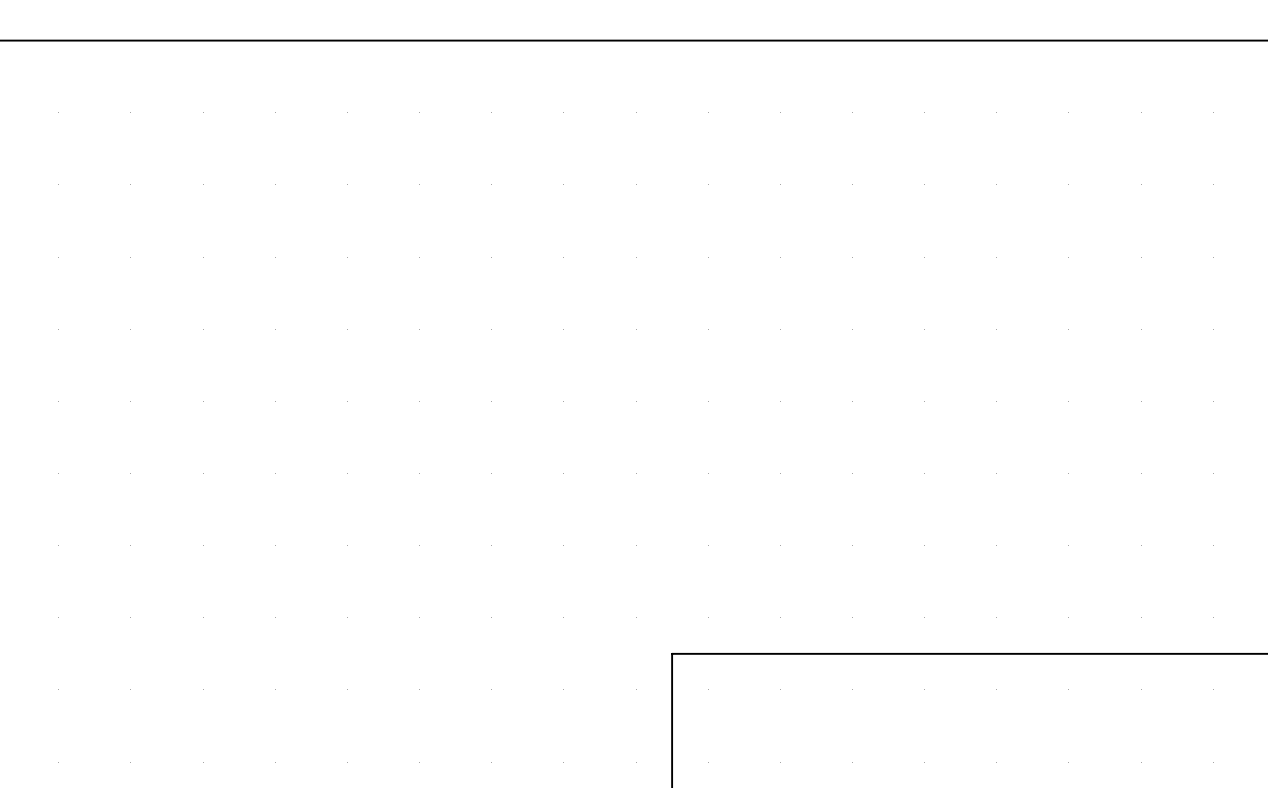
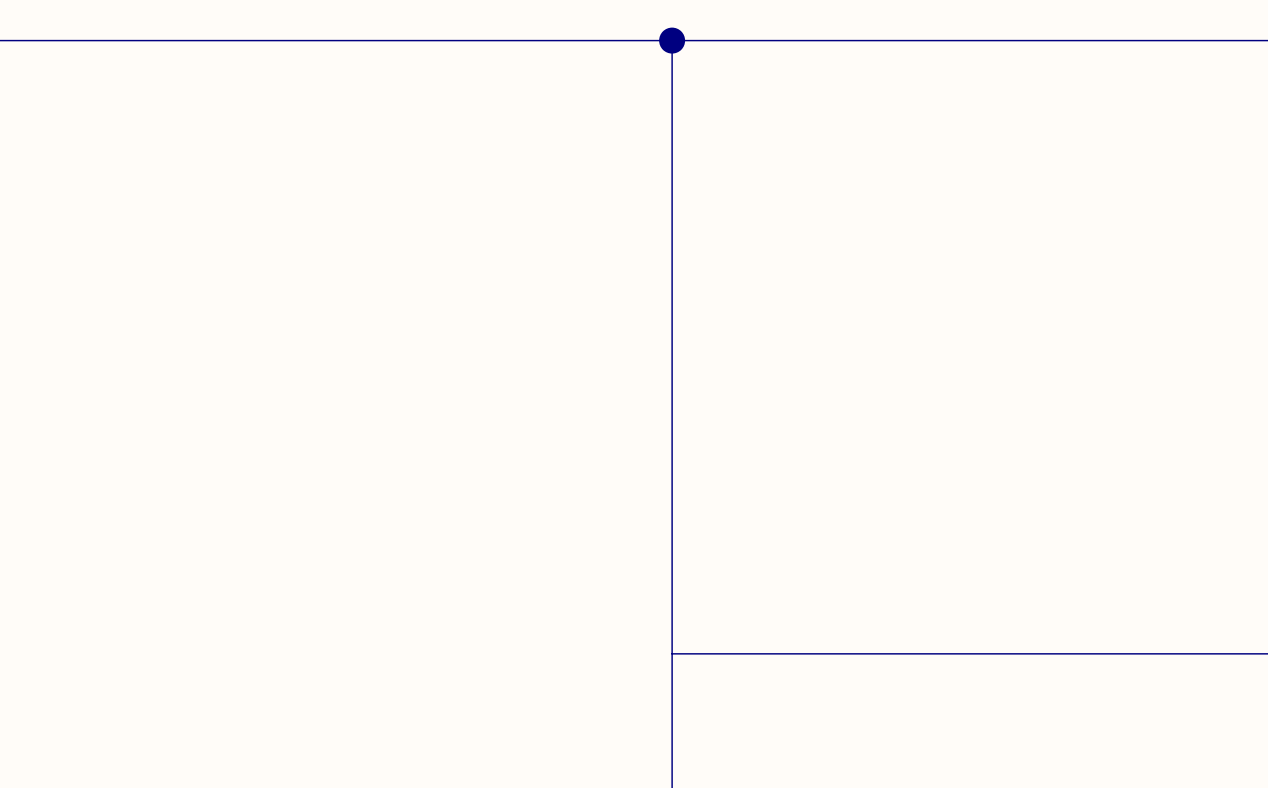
wire: none -> (672, 40) (672, 653)
junction: none -> (672, 40)

